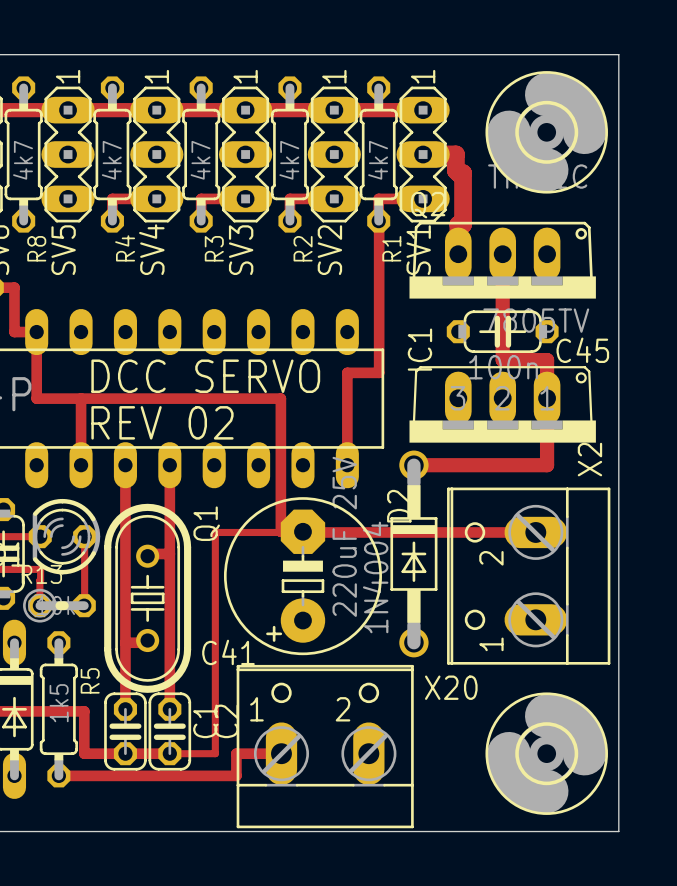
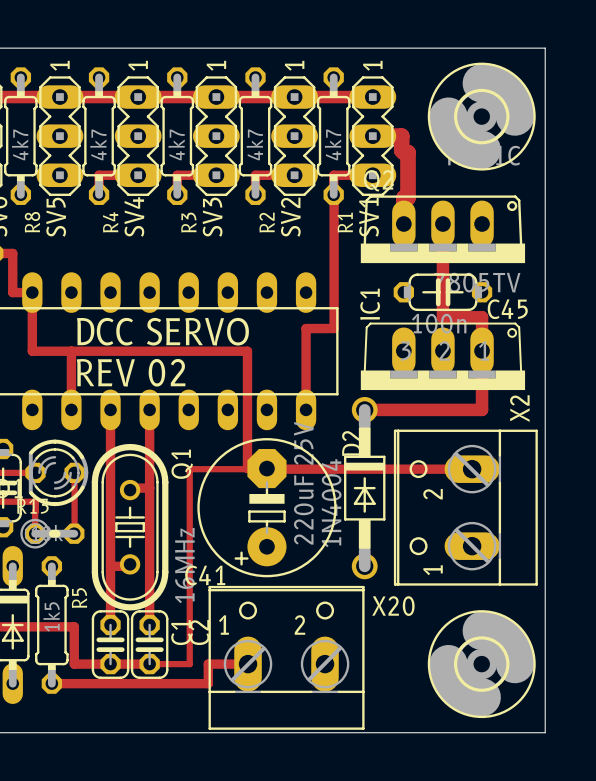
Q1 value: none -> 16MHz (184, 565)

